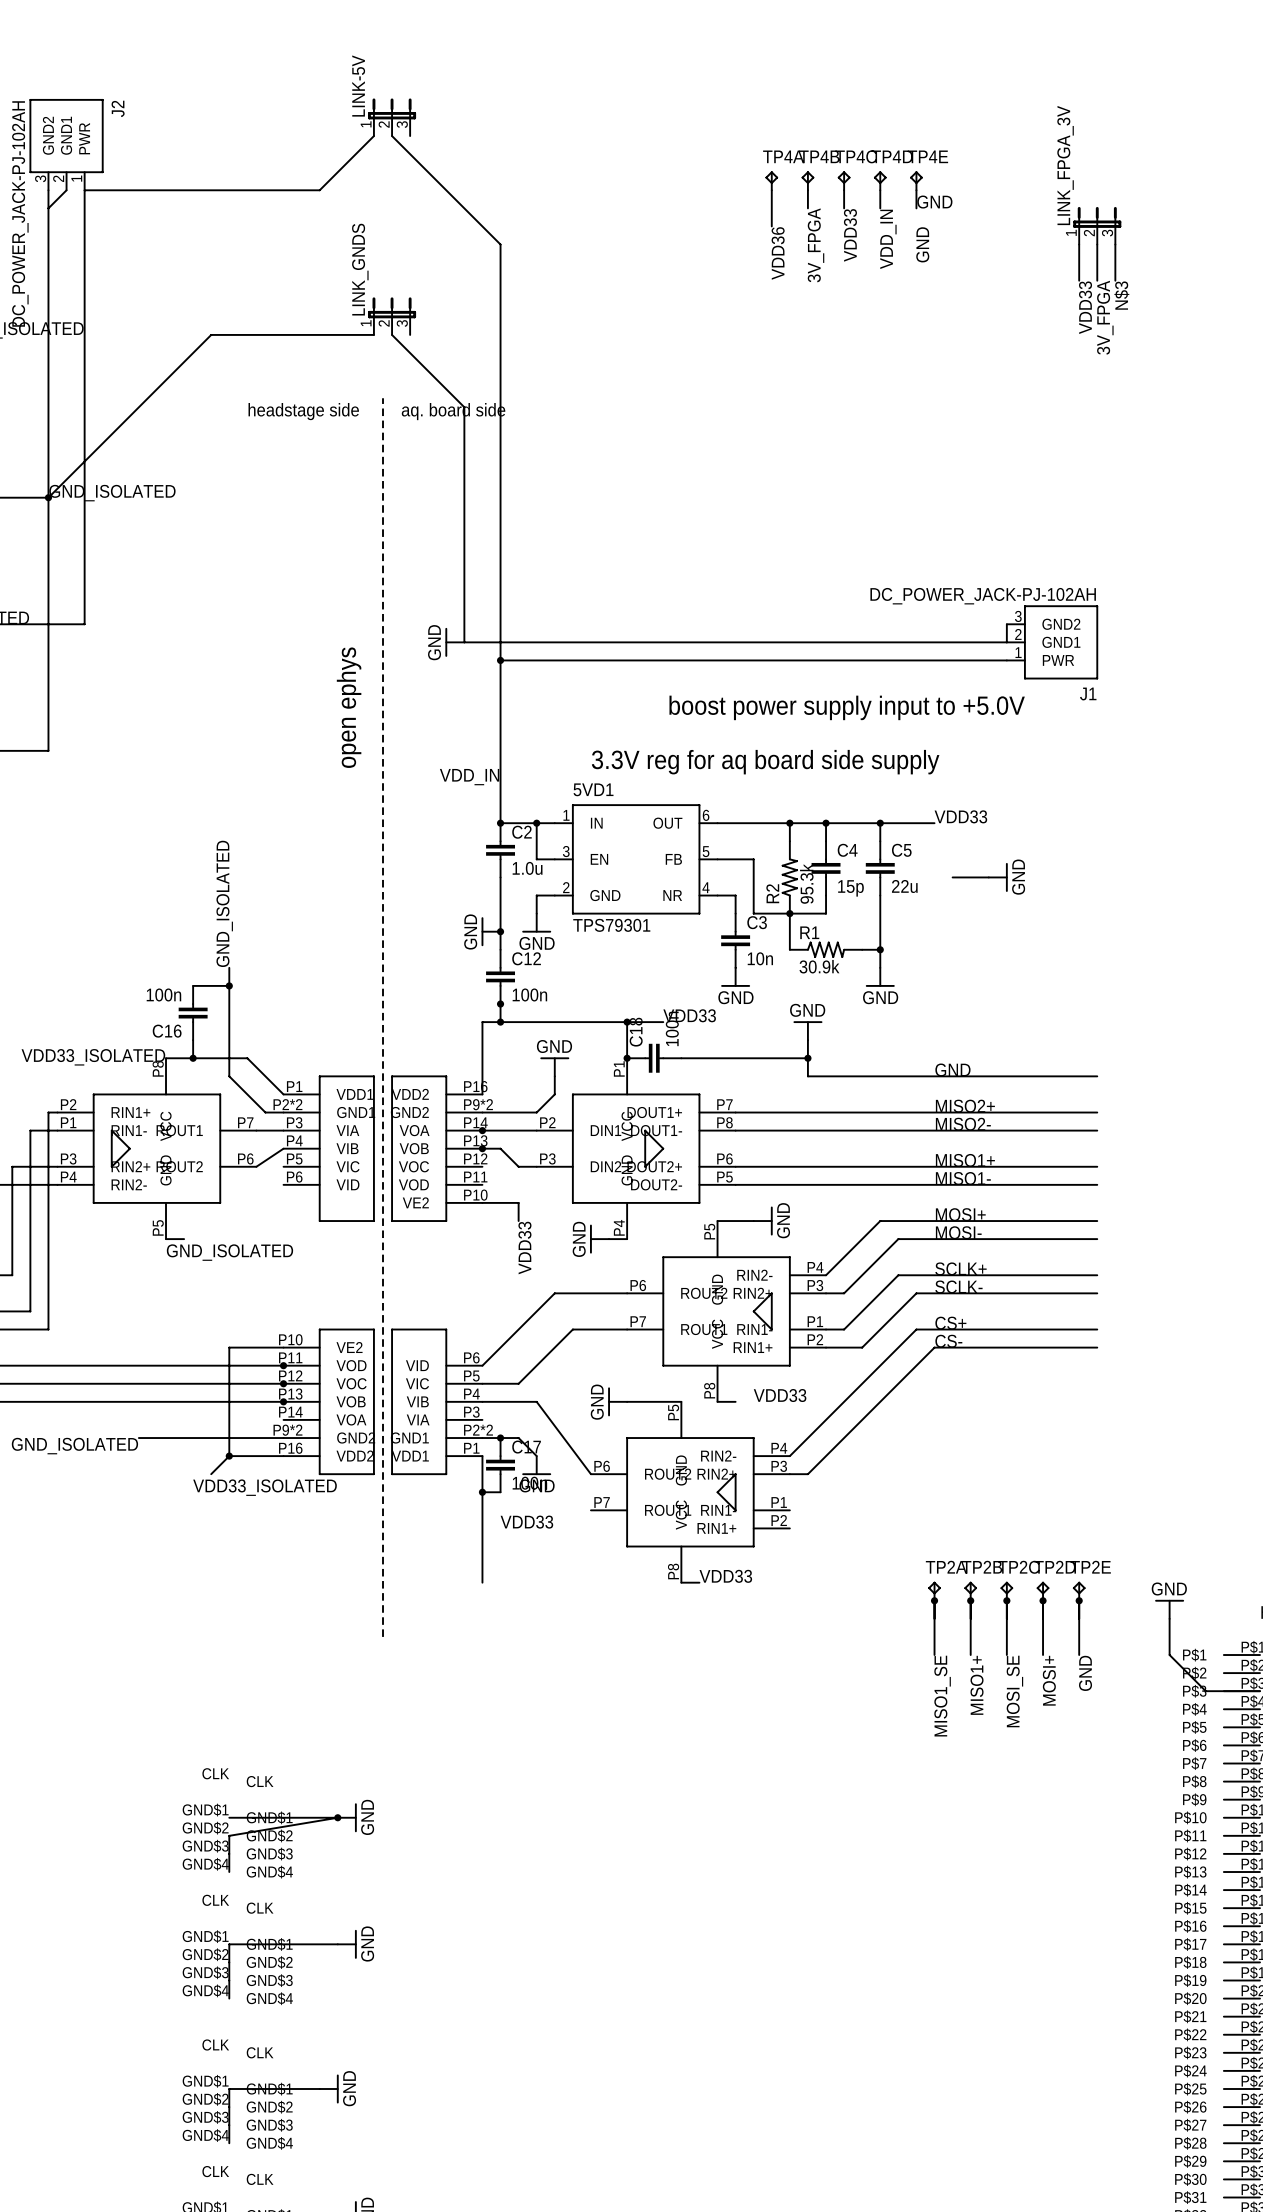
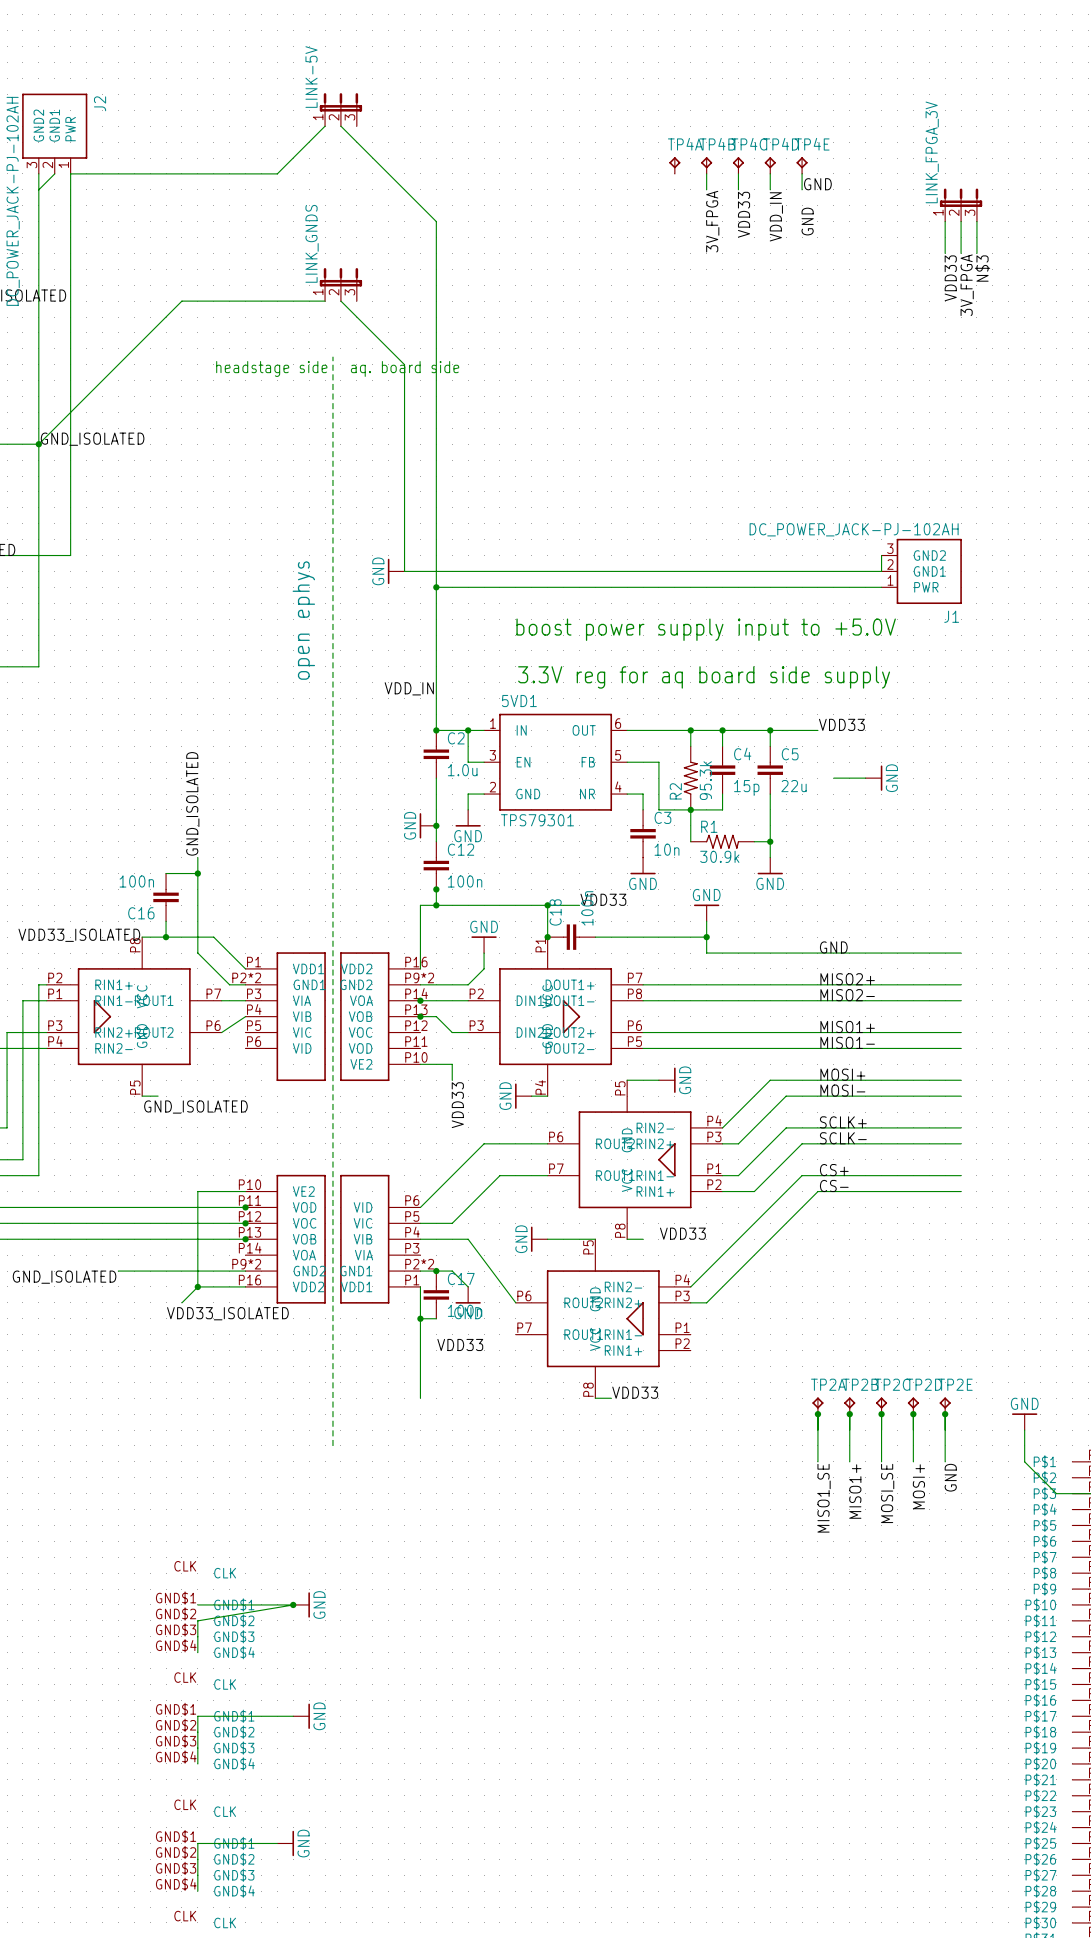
wire: (771, 190) (771, 226) -> none
label: VDD36 (778, 253) -> none

